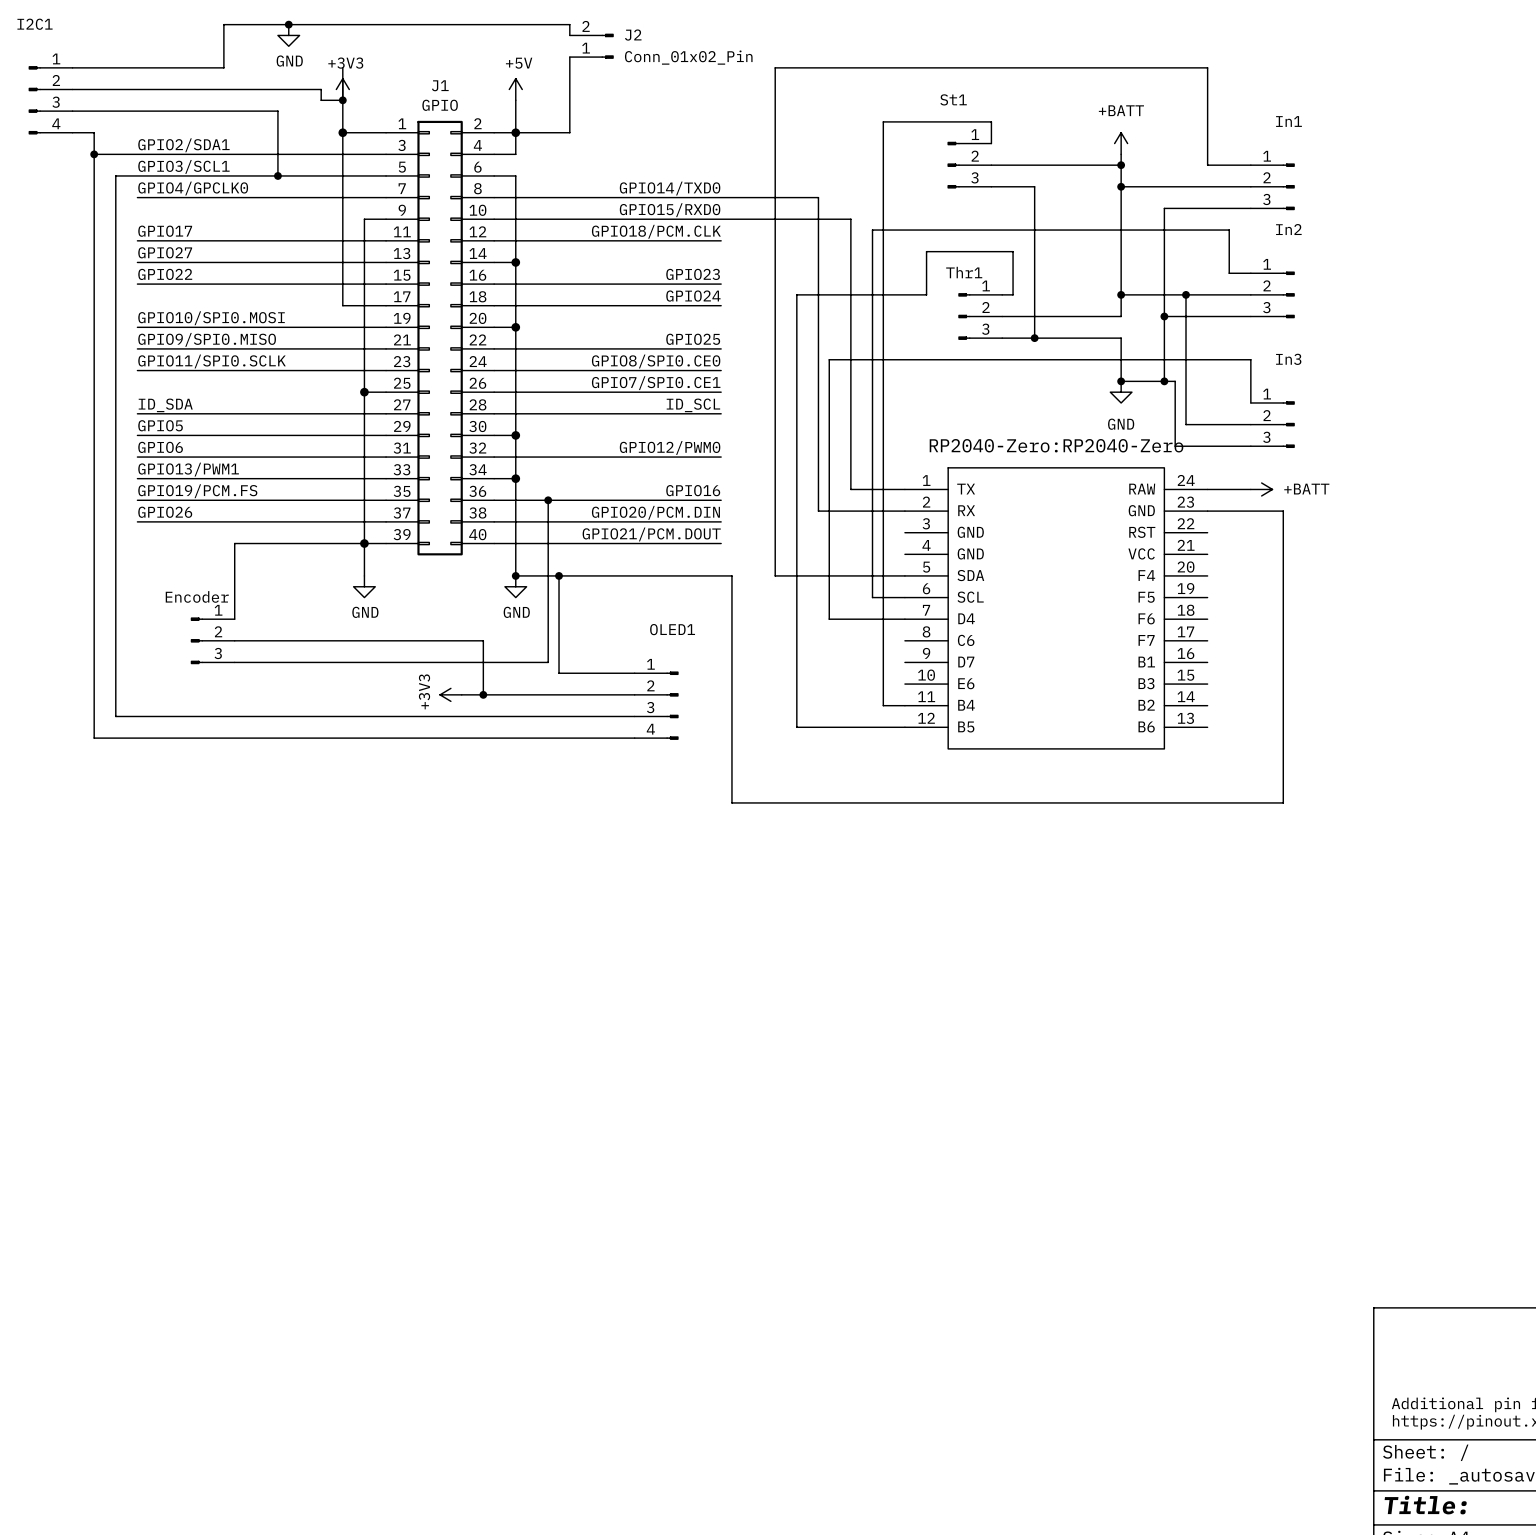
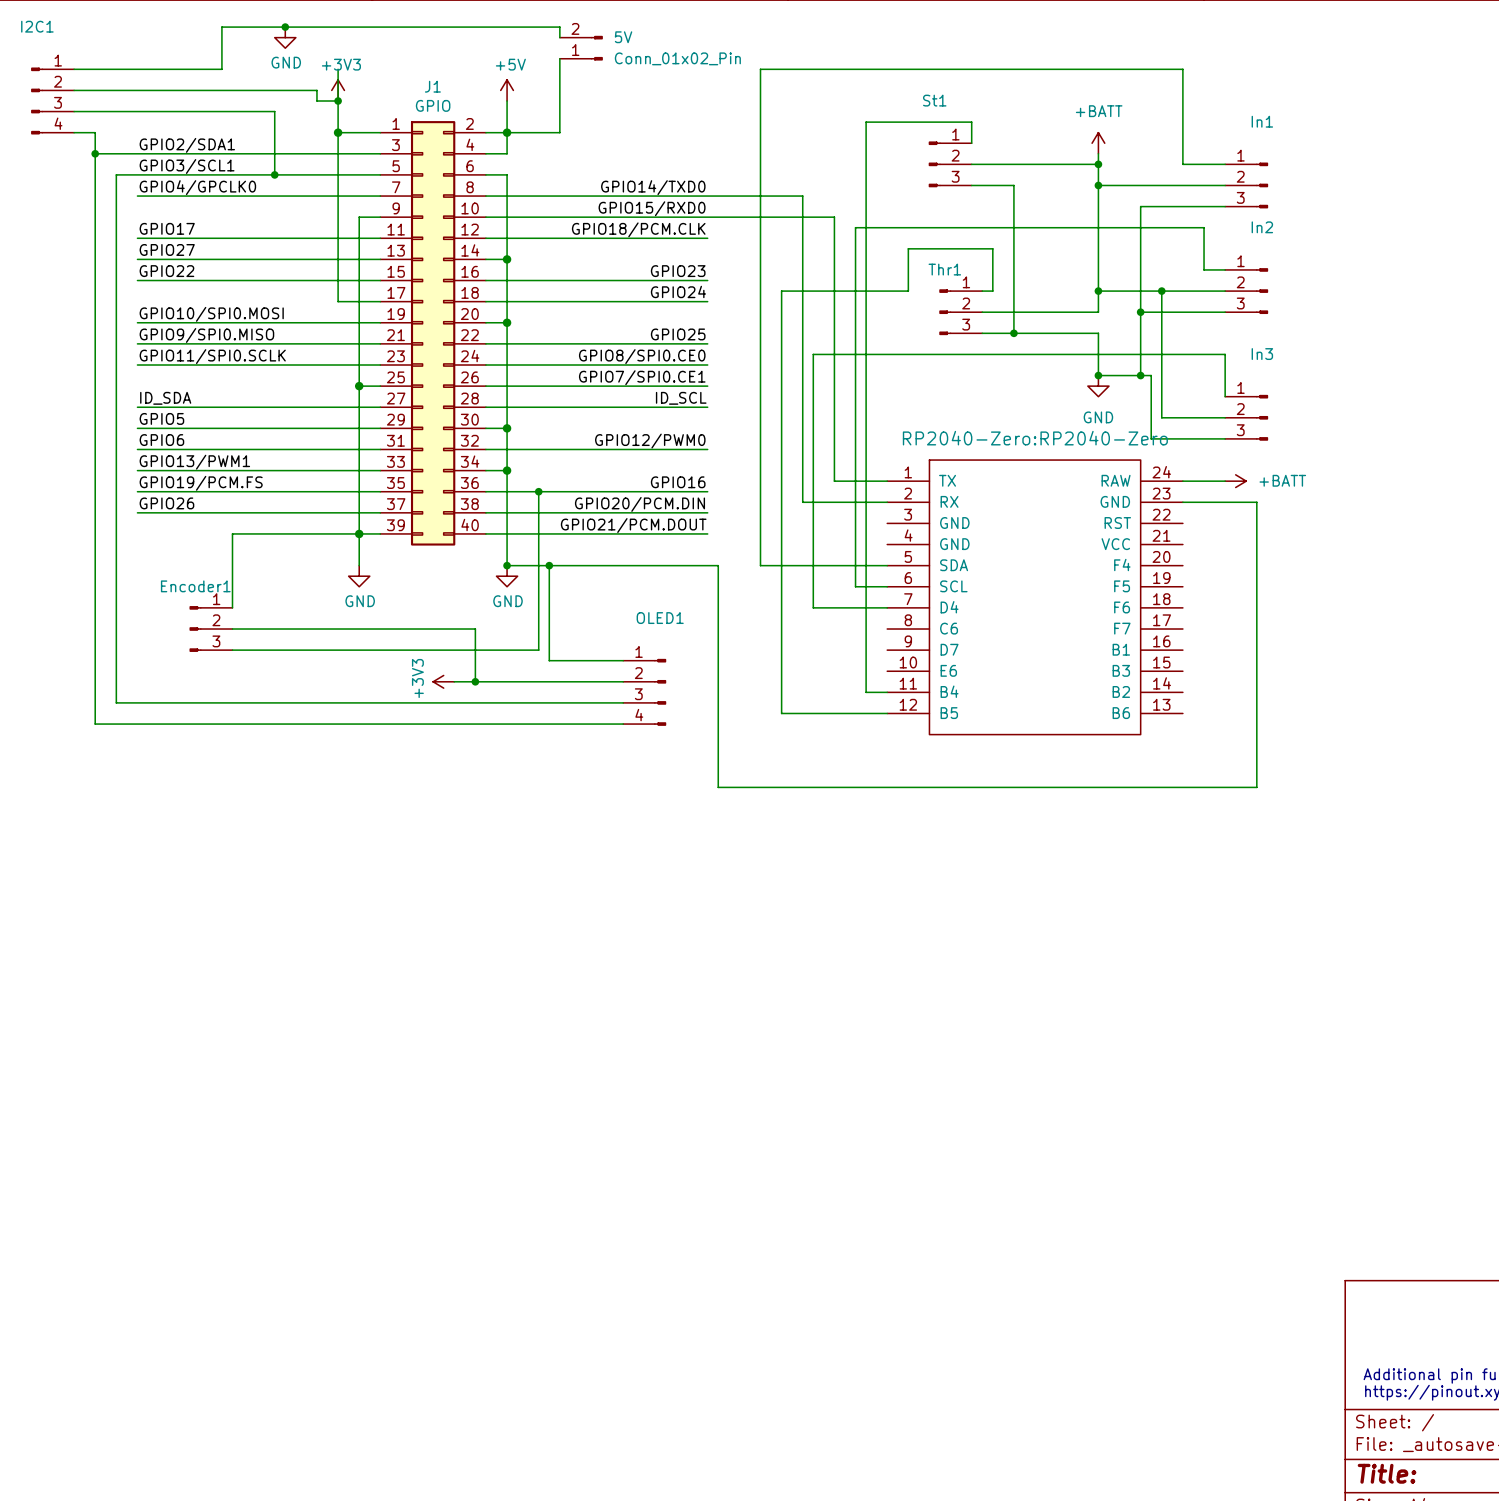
J2 name: J2 (633, 35) -> 5V (623, 37)
Encoder name: Encoder (197, 596) -> Encoder1 (195, 586)

